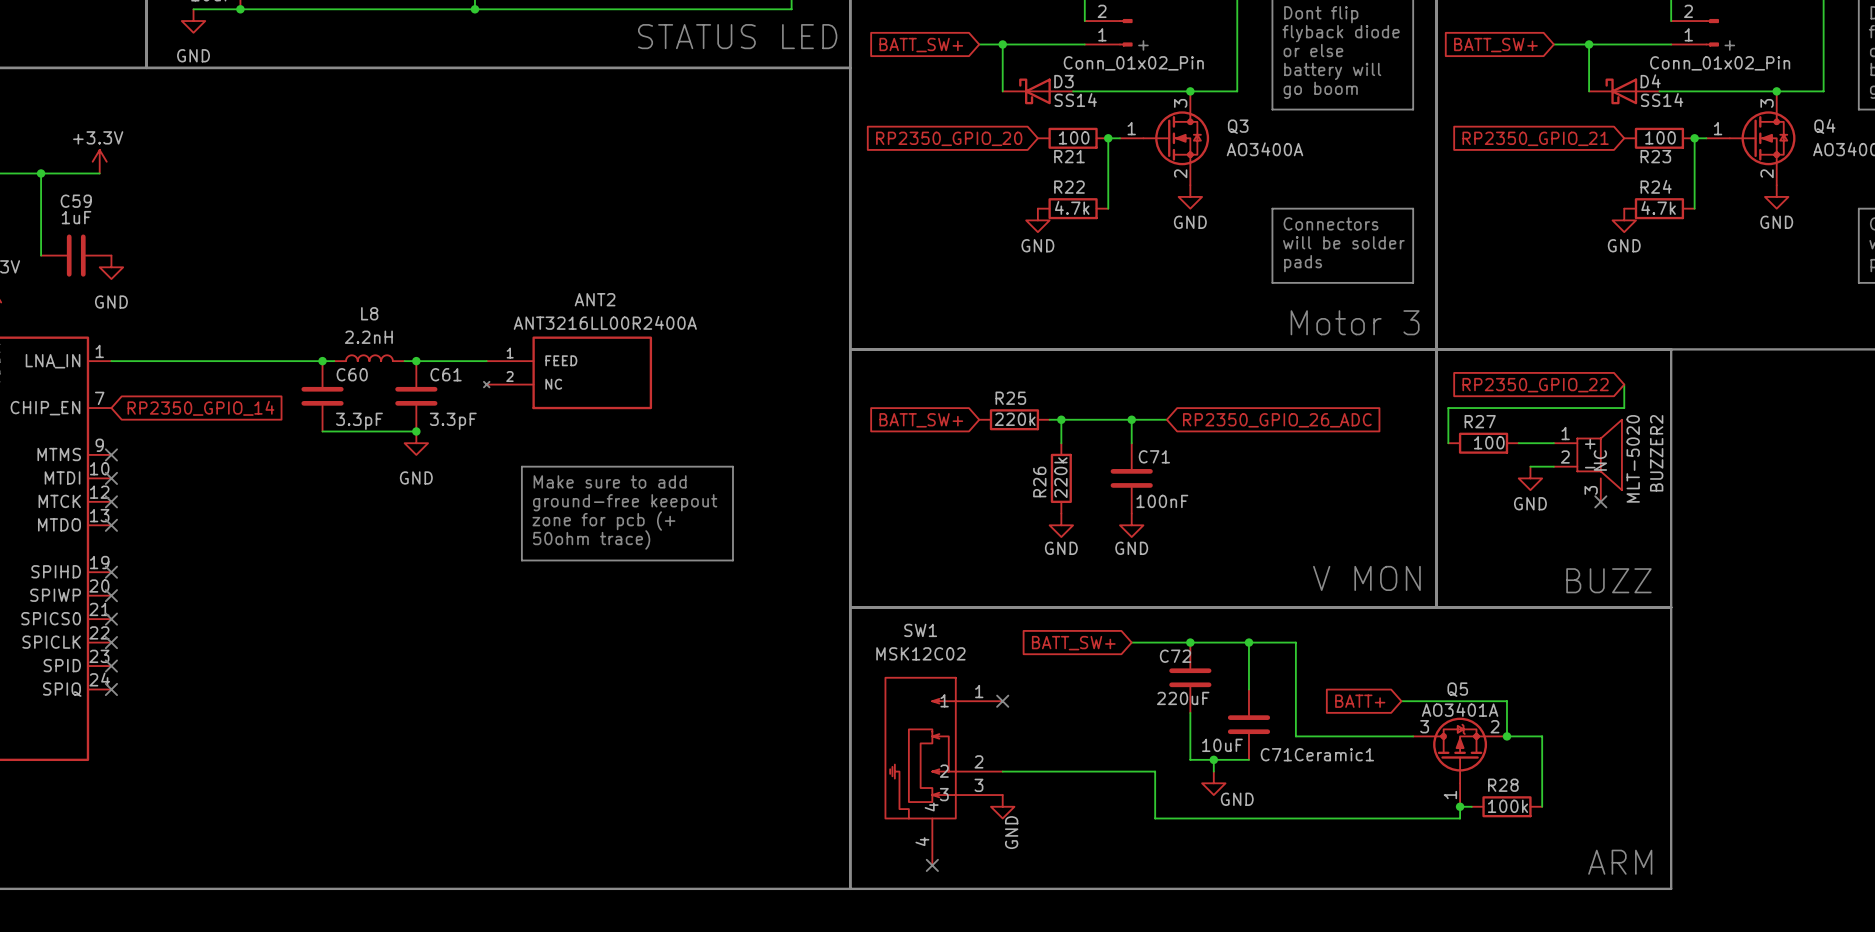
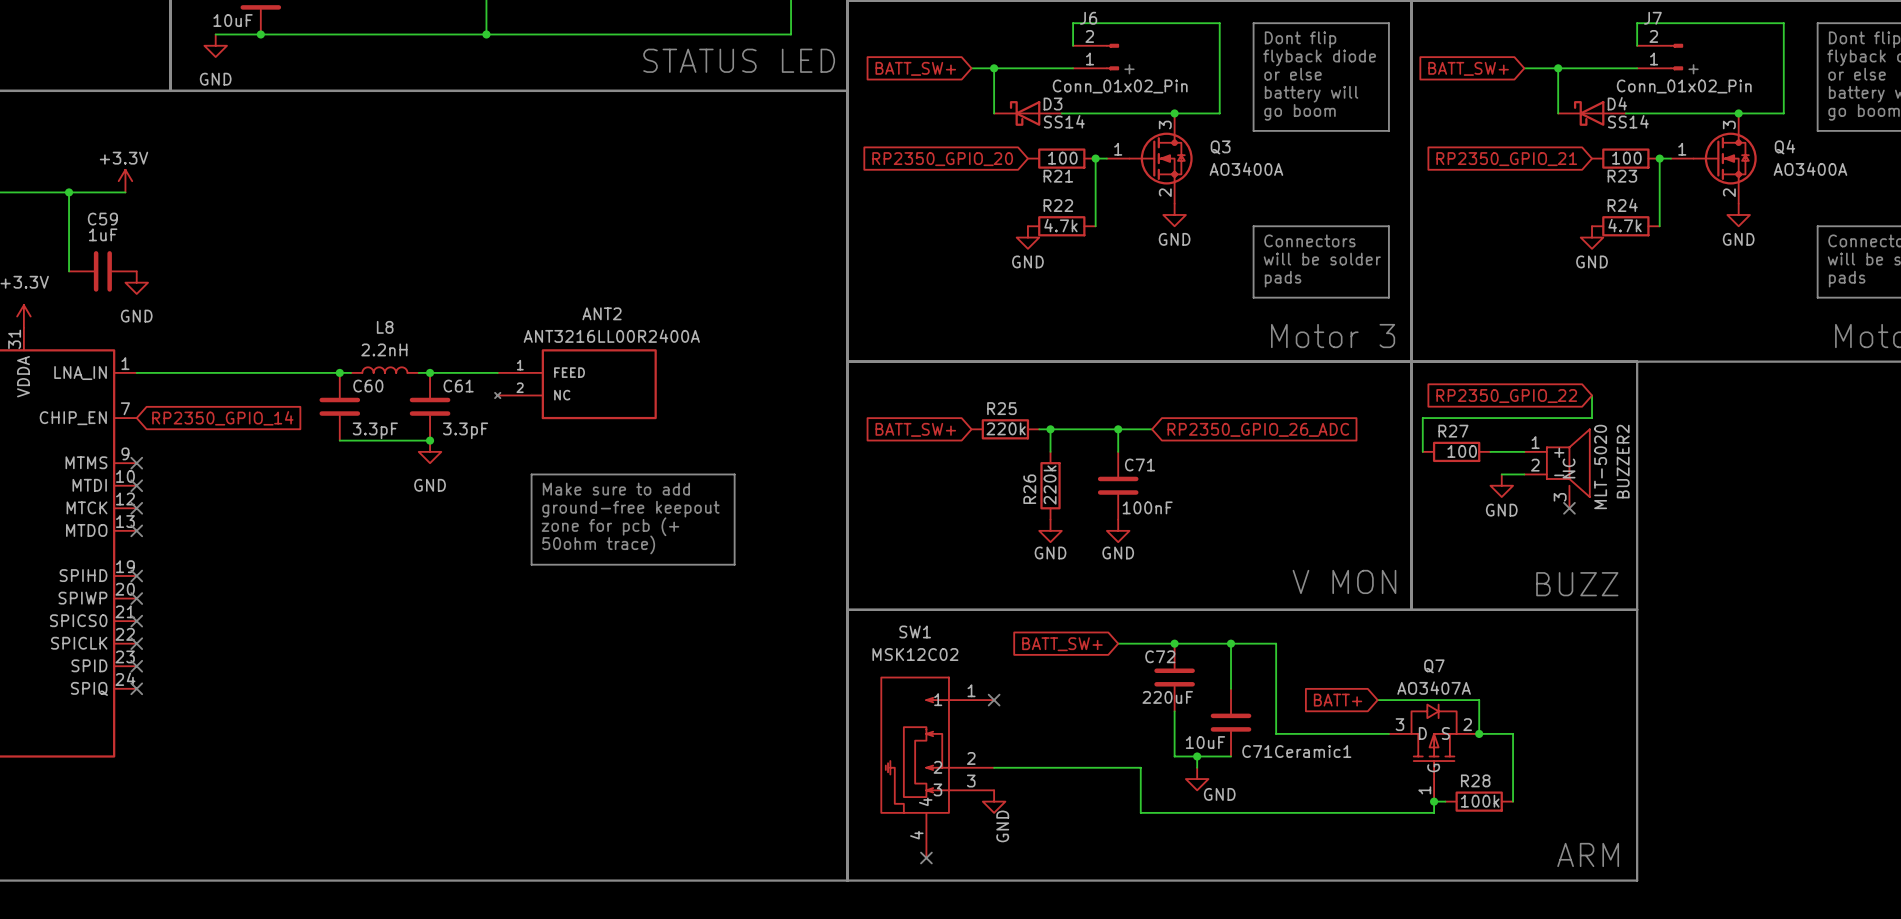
Q7: none -> AO3407A (1434, 753)
Q5: AO3401A (1460, 762) -> none

